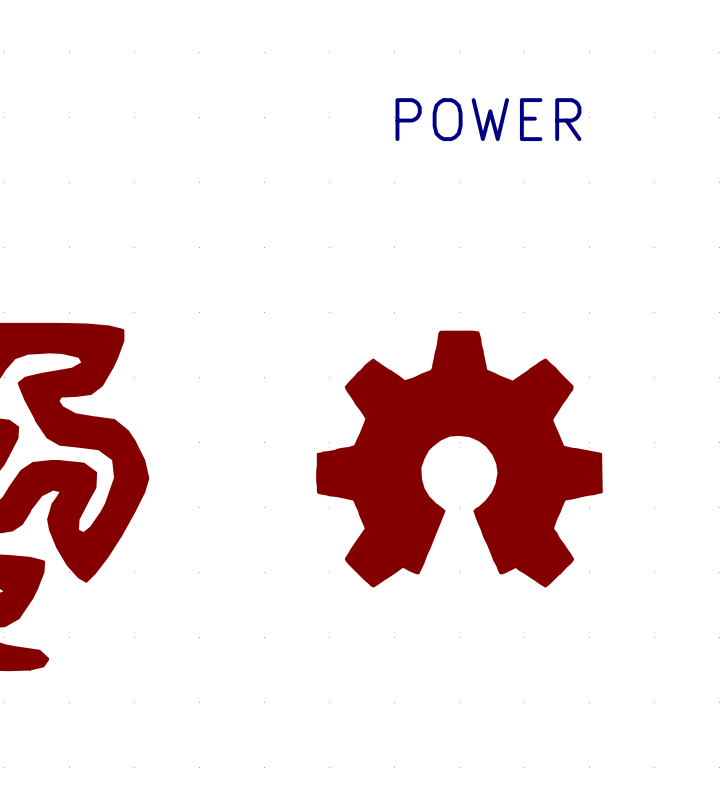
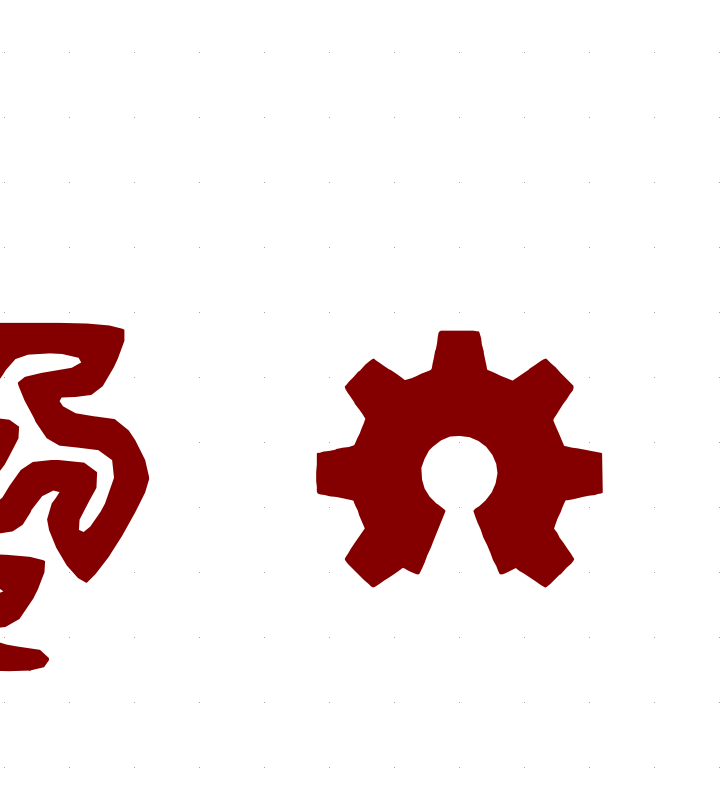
text: POWER (488, 119) -> none

